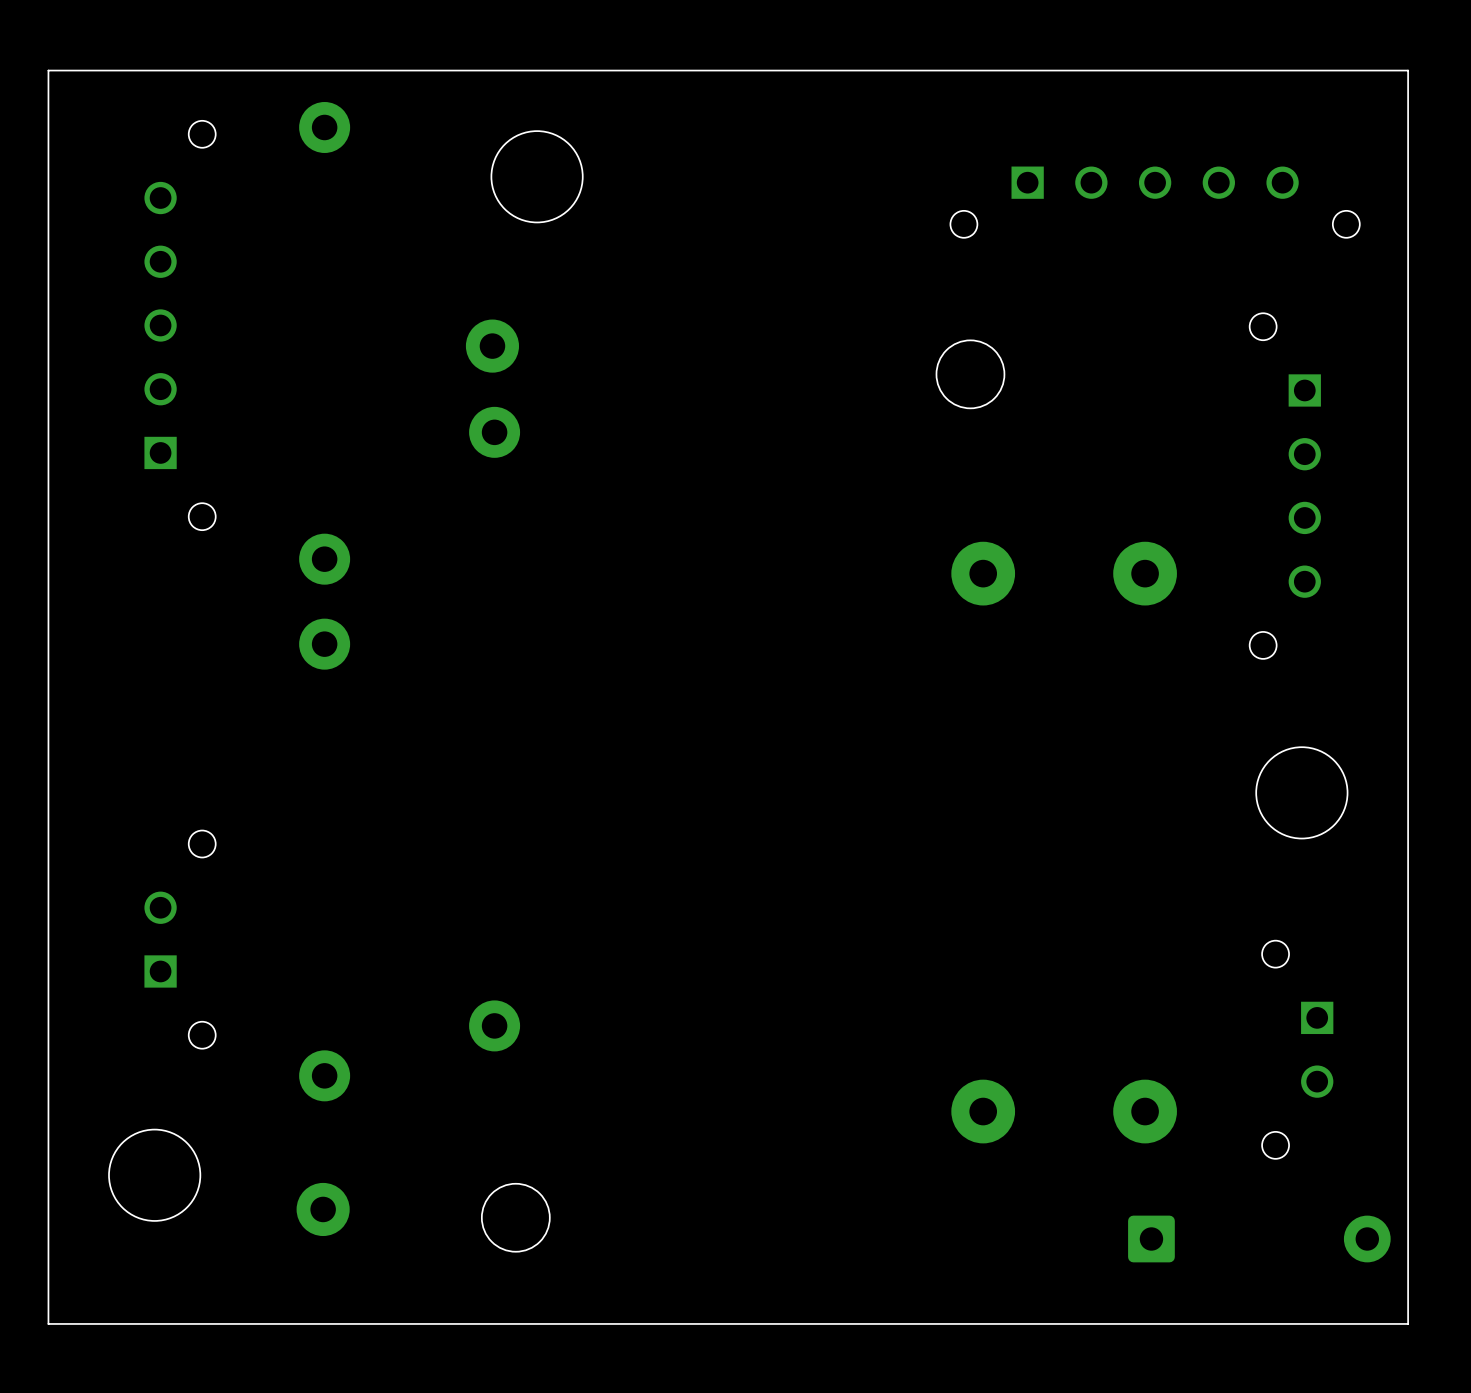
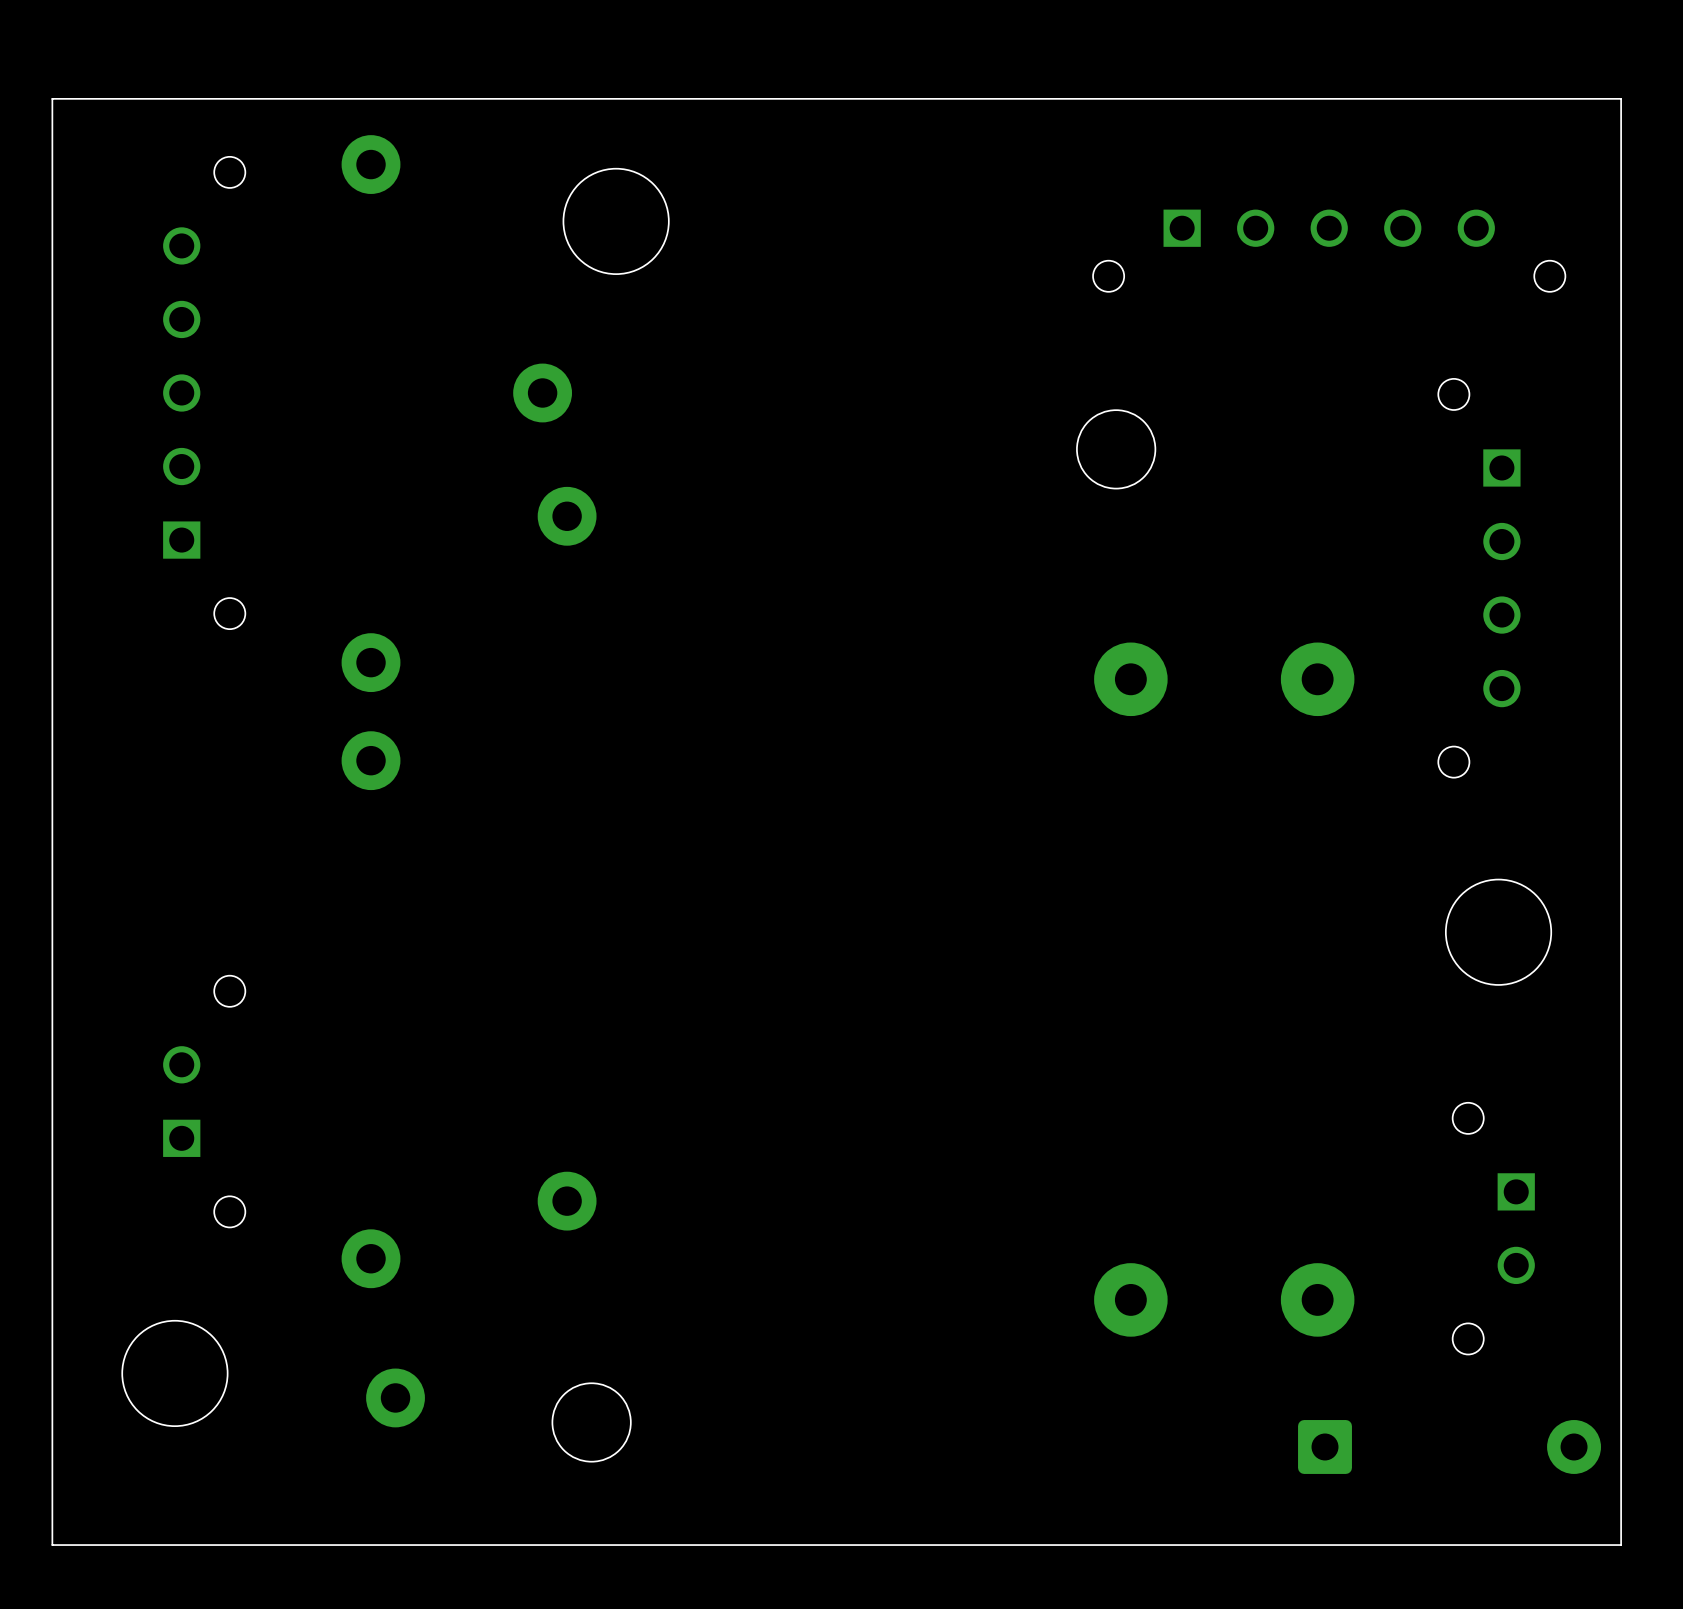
part: none -> (542, 392)
part: (492, 346) -> none
part: none -> (395, 1397)
part: (323, 1209) -> none

